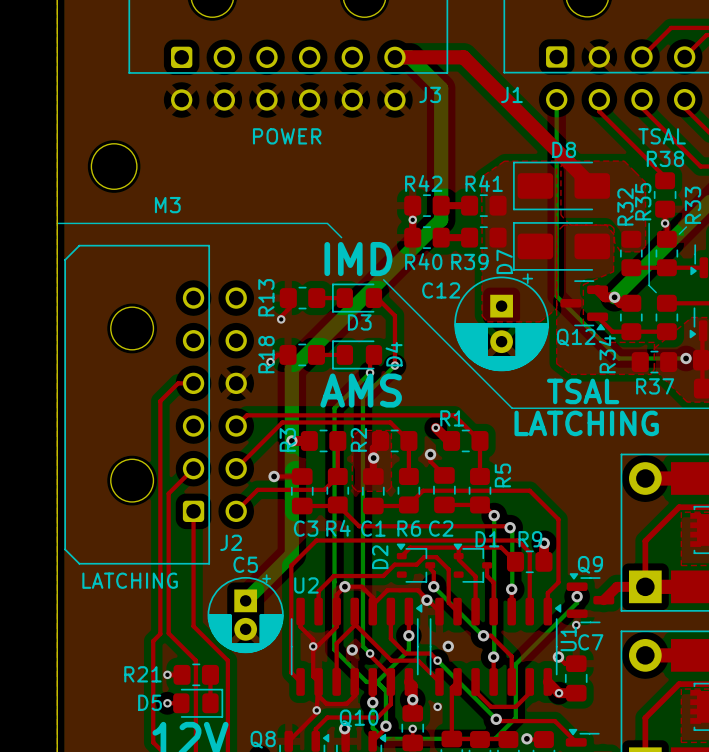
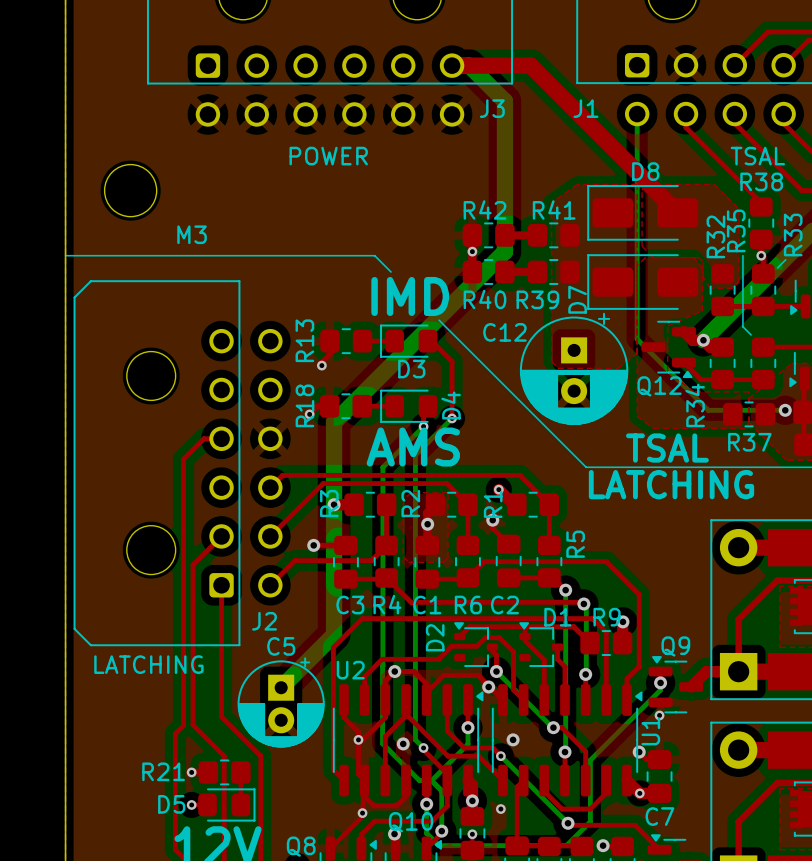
R1 name rotation: 0° (452, 418) -> 90° counterclockwise (493, 504)
C7 name position: C7 (590, 642) -> C7 (659, 816)

